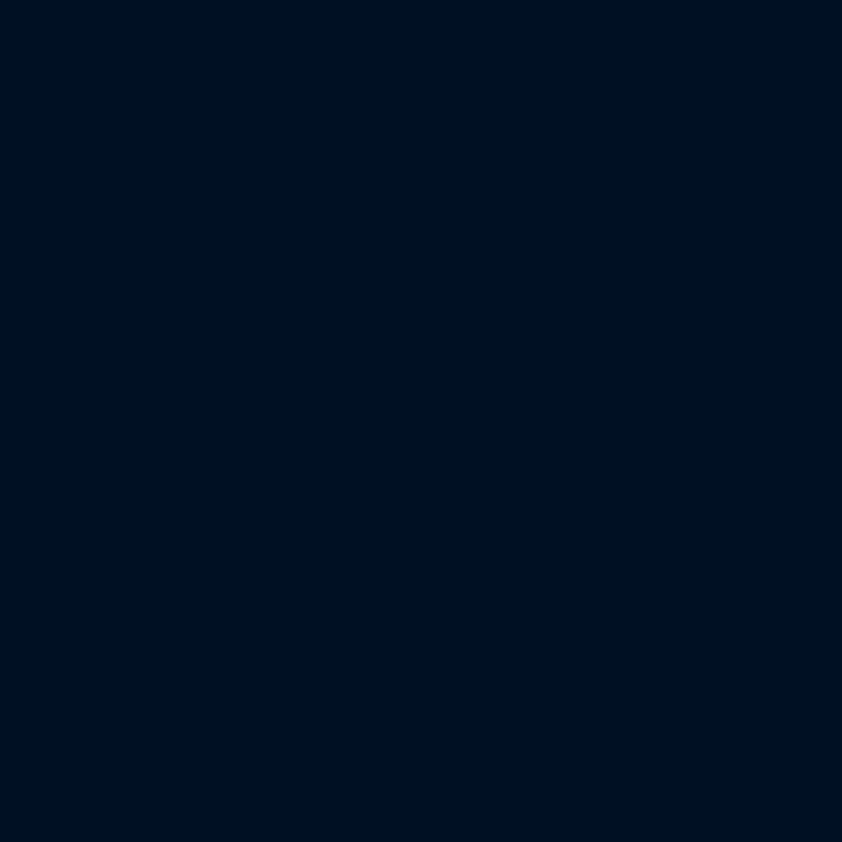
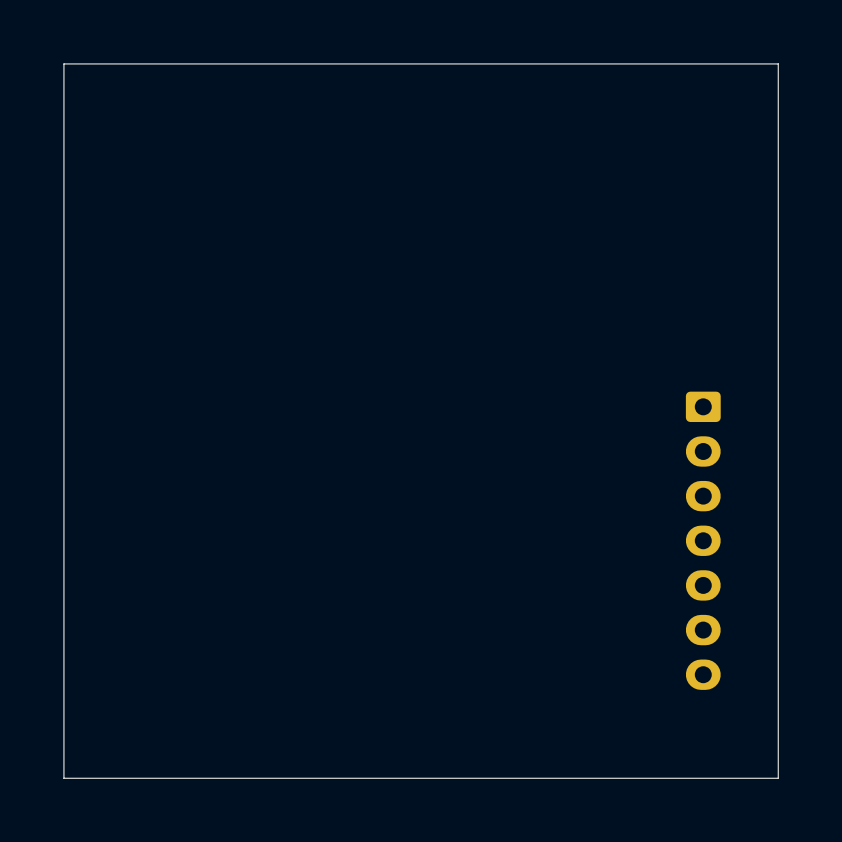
board edge: none -> (778, 63) (63, 63) (63, 778) (778, 778) (778, 63)
part: none -> (703, 540)

